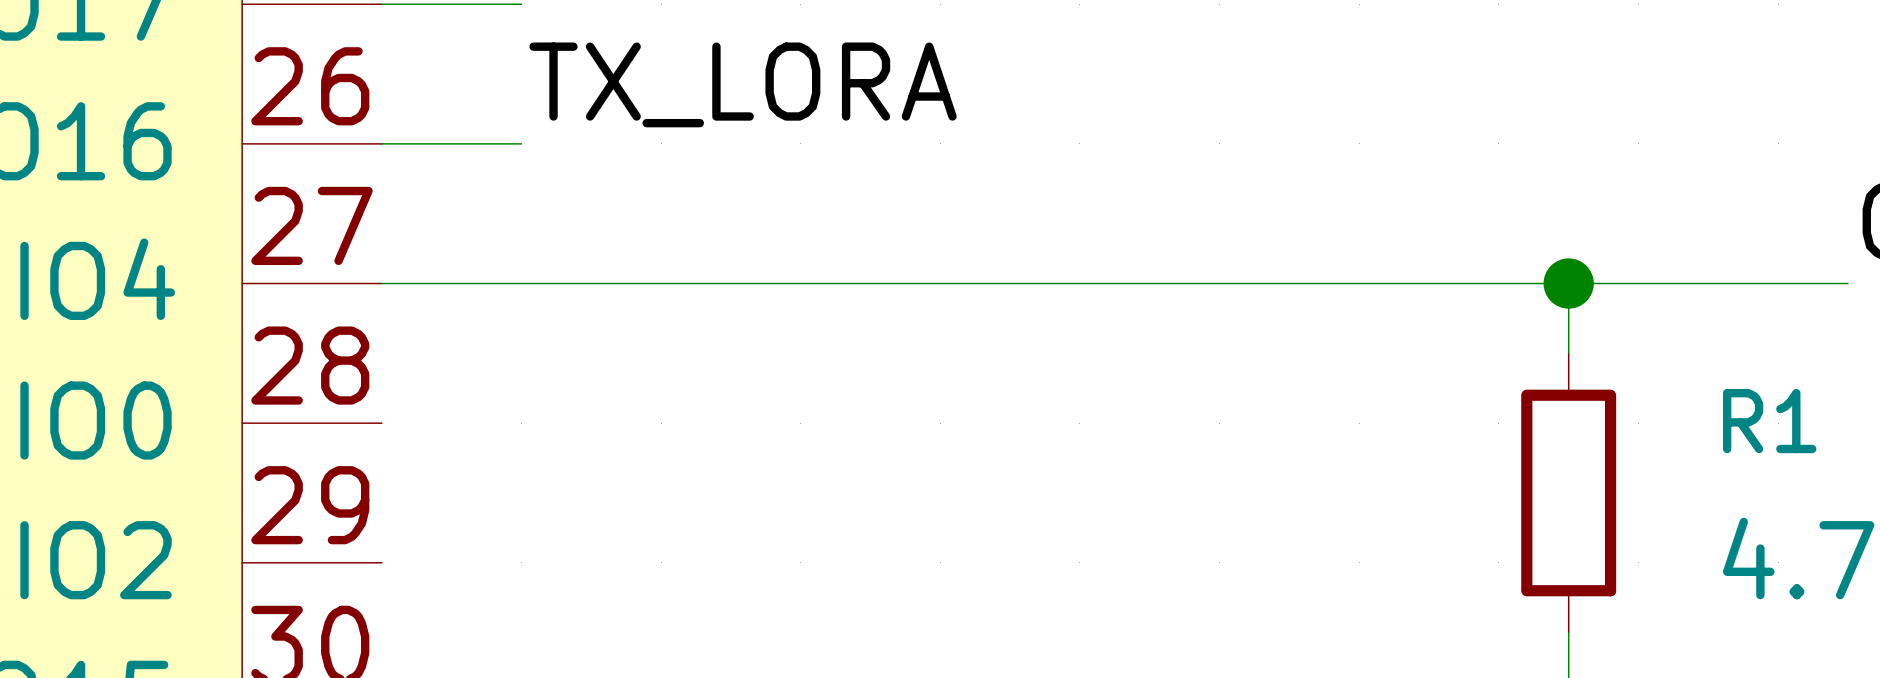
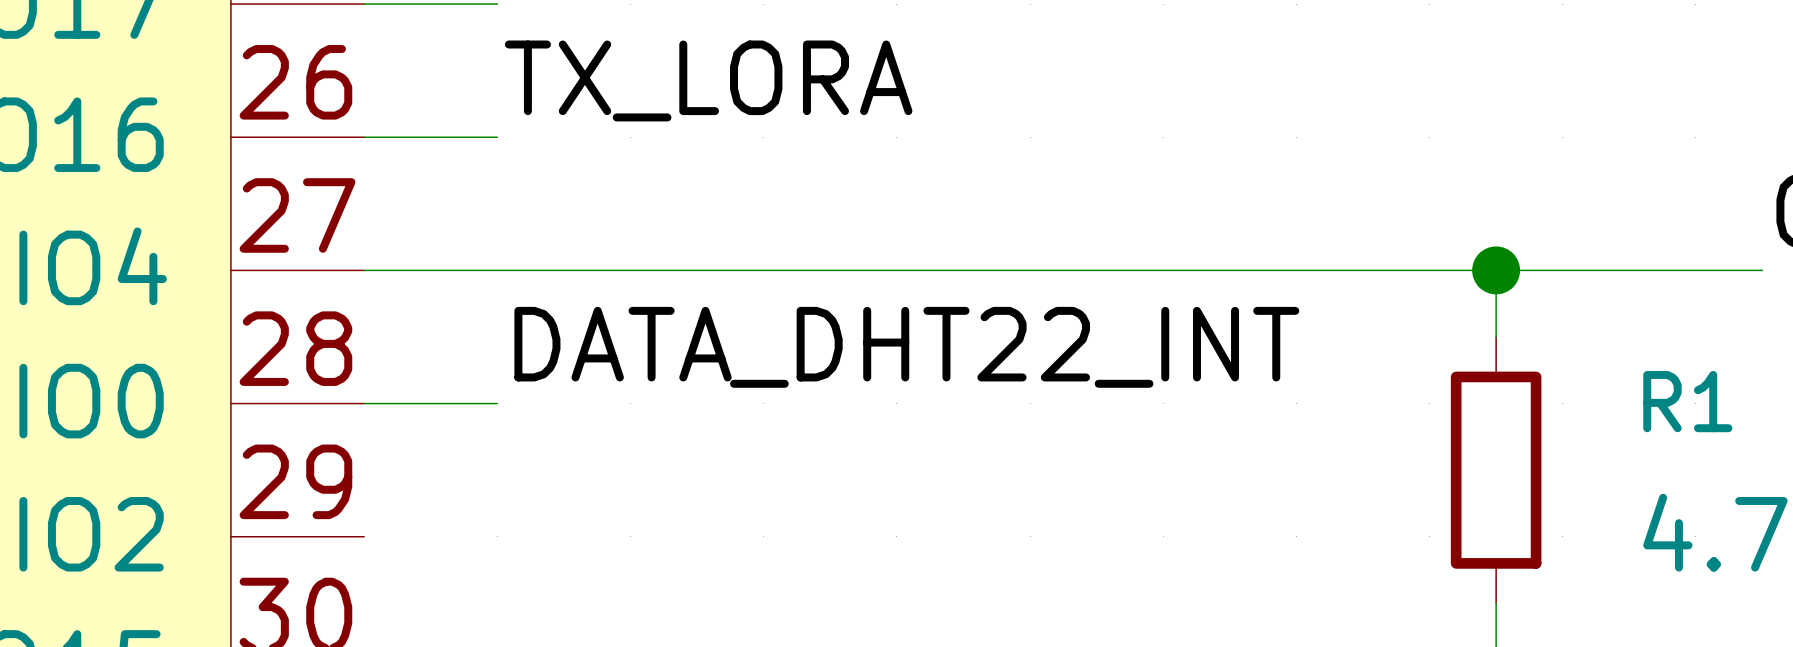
label: none -> DATA_DHT22_INT (906, 347)
wire: none -> (364, 403) (497, 403)

